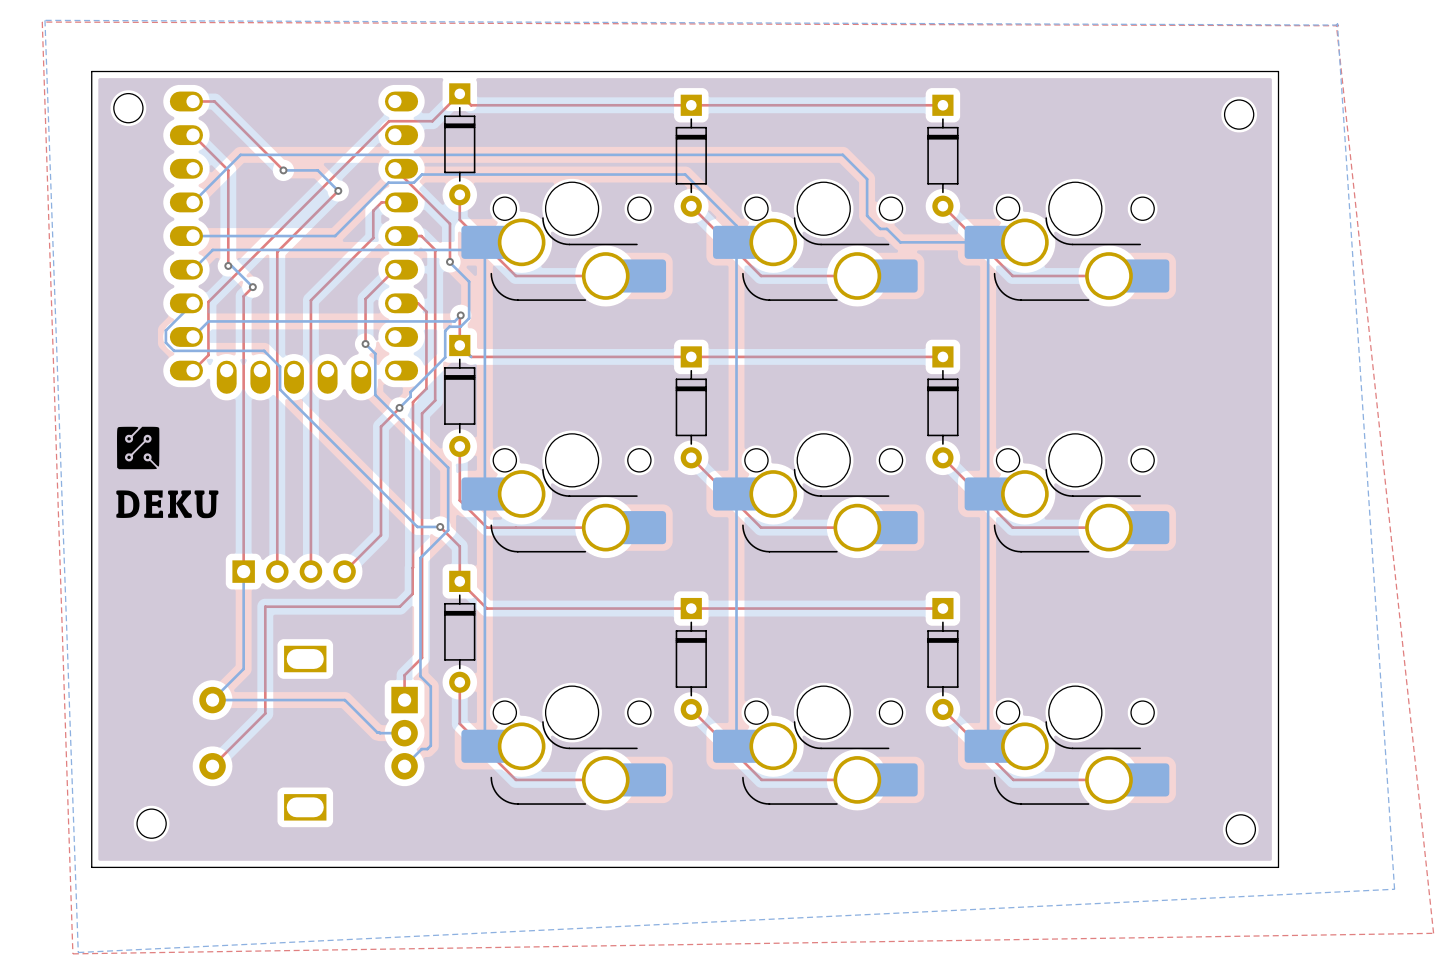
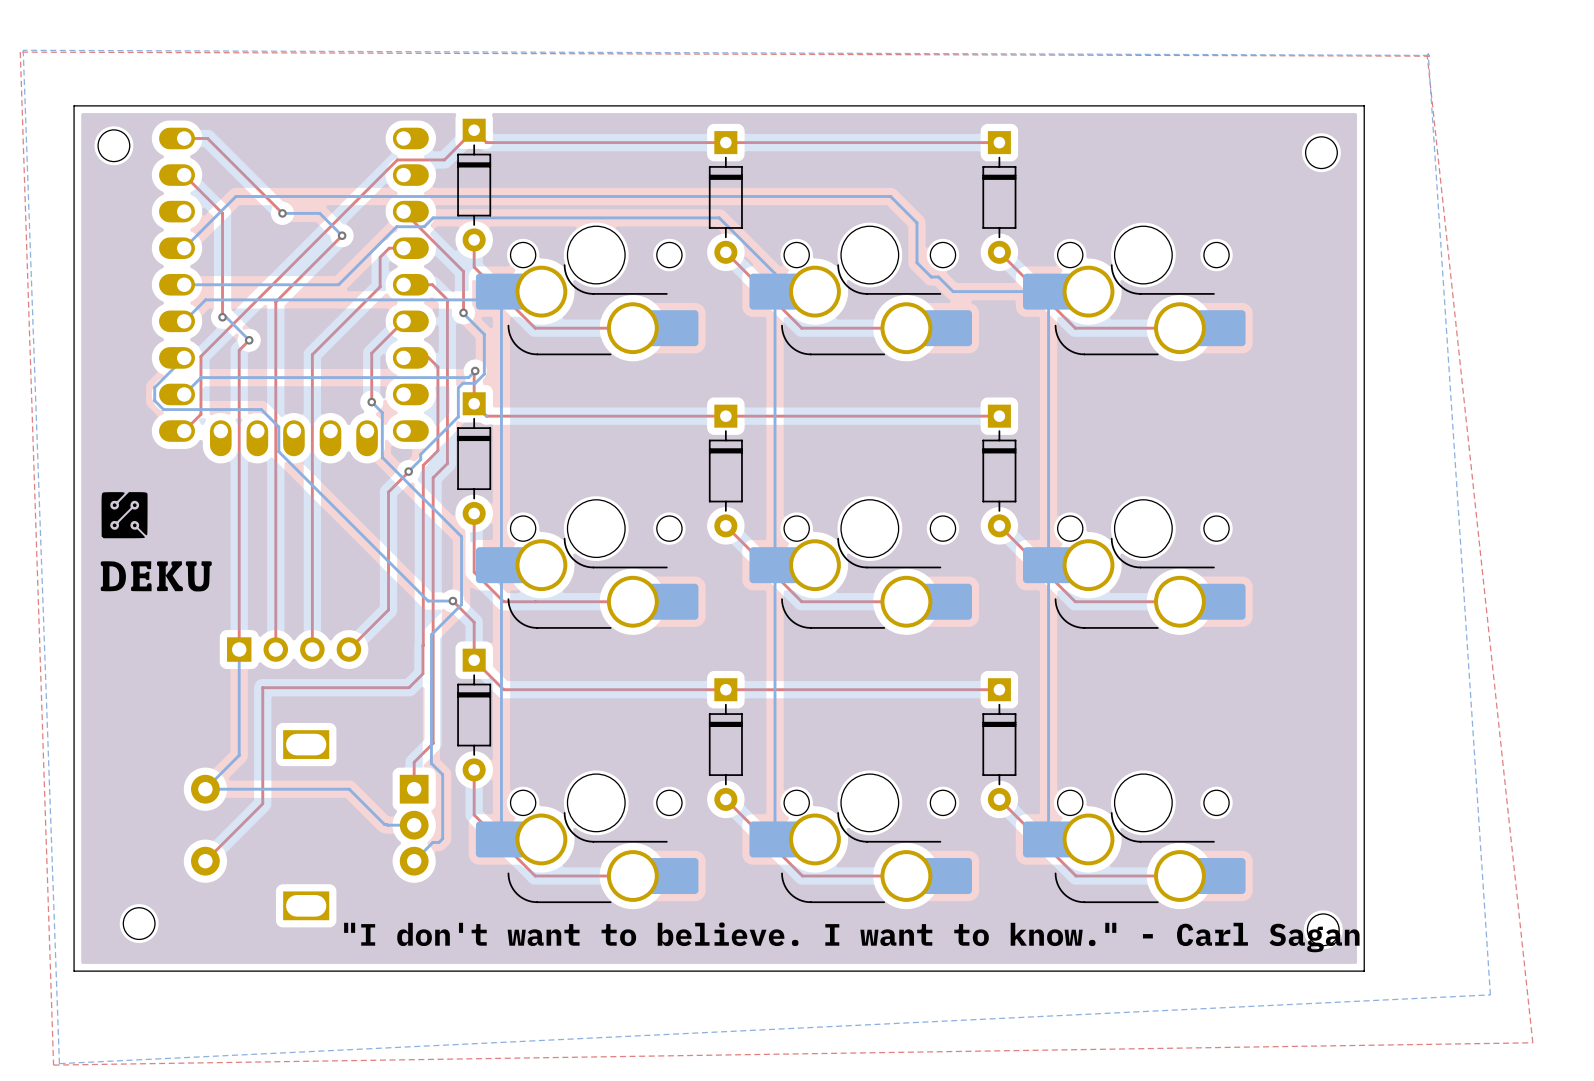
text: none -> "I don't want to believe. I want to know." - Carl Sagan (851, 937)

